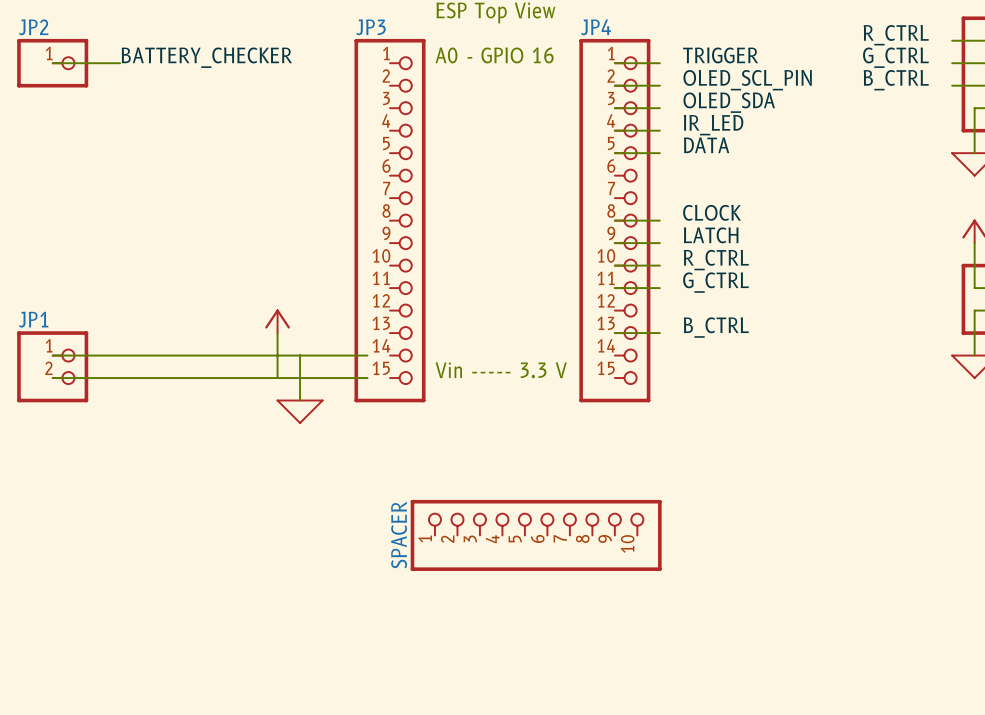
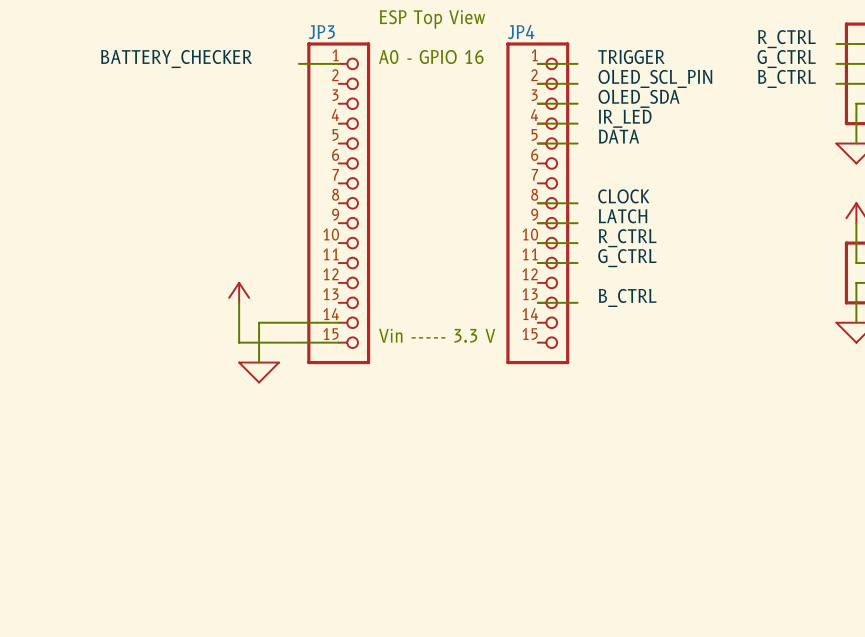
wire: (52, 63) (120, 63) -> none
JP2: (52, 63) -> none
wire: none -> (298, 63) (338, 63)
wire: (52, 355) (300, 355) -> none
wire: none -> (318, 322) (338, 322)
JP1: (52, 366) -> none
wire: (52, 378) (277, 378) -> none
wire: none -> (318, 342) (338, 342)
SPACER: (536, 535) -> none

